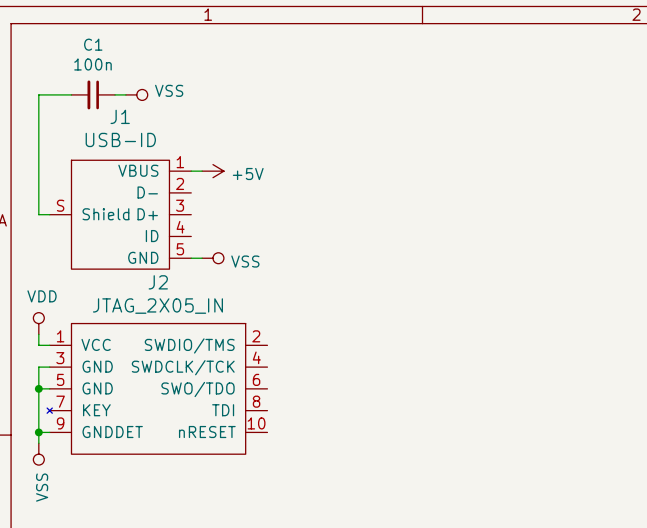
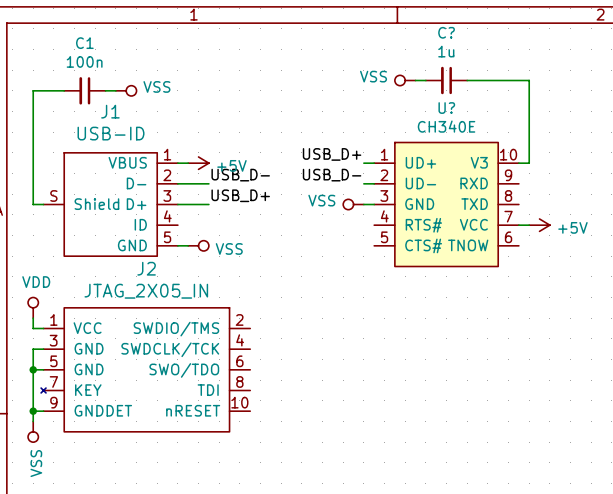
power symbol: none -> VSS (405, 80)
wire: none -> (415, 80) (425, 80)
C?: none -> 1u (446, 80)
wire: none -> (467, 80) (529, 80) (529, 163) (518, 163)
label: none -> USB_D+ (332, 154)
wire: none -> (363, 163) (374, 163)
label: none -> USB_D- (240, 175)
label: none -> USB_D- (332, 175)
wire: none -> (177, 183) (208, 183)
wire: none -> (363, 183) (374, 183)
label: none -> USB_D+ (240, 195)
wire: none -> (177, 204) (208, 204)
power symbol: none -> VSS (353, 204)
wire: none -> (363, 204) (374, 204)
U?: none -> CH340E (446, 204)
wire: none -> (518, 225) (529, 225)
power symbol: none -> +5V (539, 225)

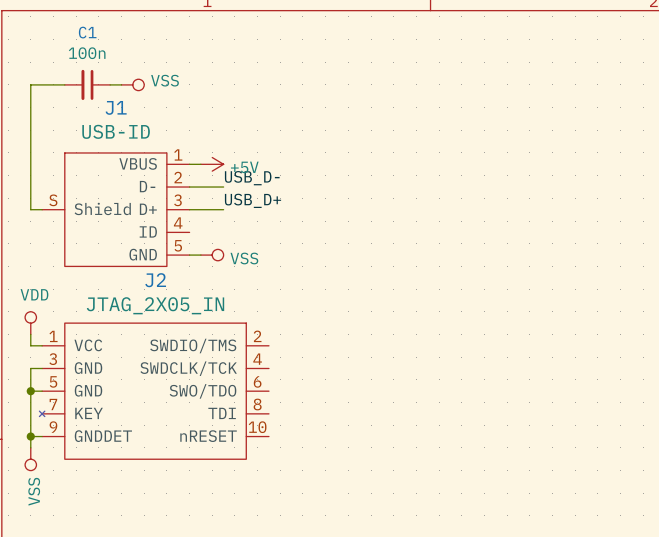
power symbol: VSS (405, 80) -> none
wire: (415, 80) (425, 80) -> none
C?: 1u (446, 80) -> none
wire: (467, 80) (529, 80) (529, 163) (518, 163) -> none
label: USB_D+ (332, 154) -> none
wire: (363, 163) (374, 163) -> none
label: USB_D- (332, 175) -> none
wire: (363, 183) (374, 183) -> none
power symbol: VSS (353, 204) -> none
wire: (363, 204) (374, 204) -> none
U?: CH340E (446, 204) -> none
wire: (518, 225) (529, 225) -> none
power symbol: +5V (539, 225) -> none

